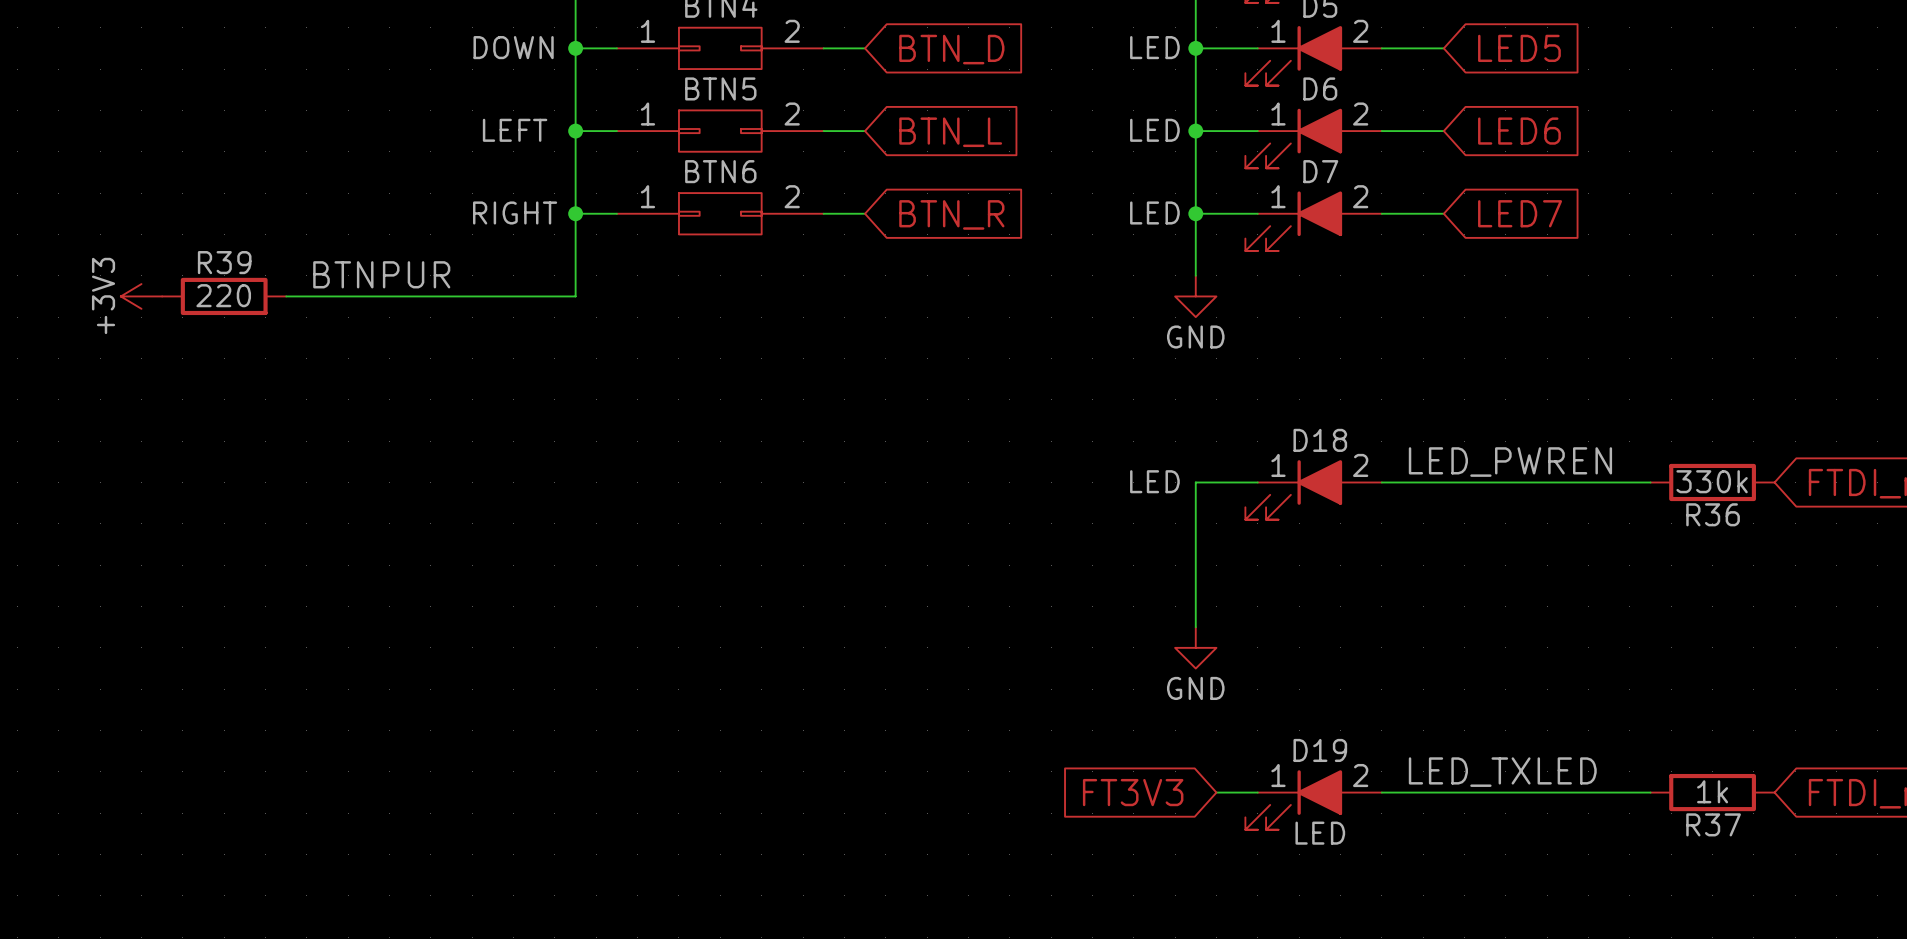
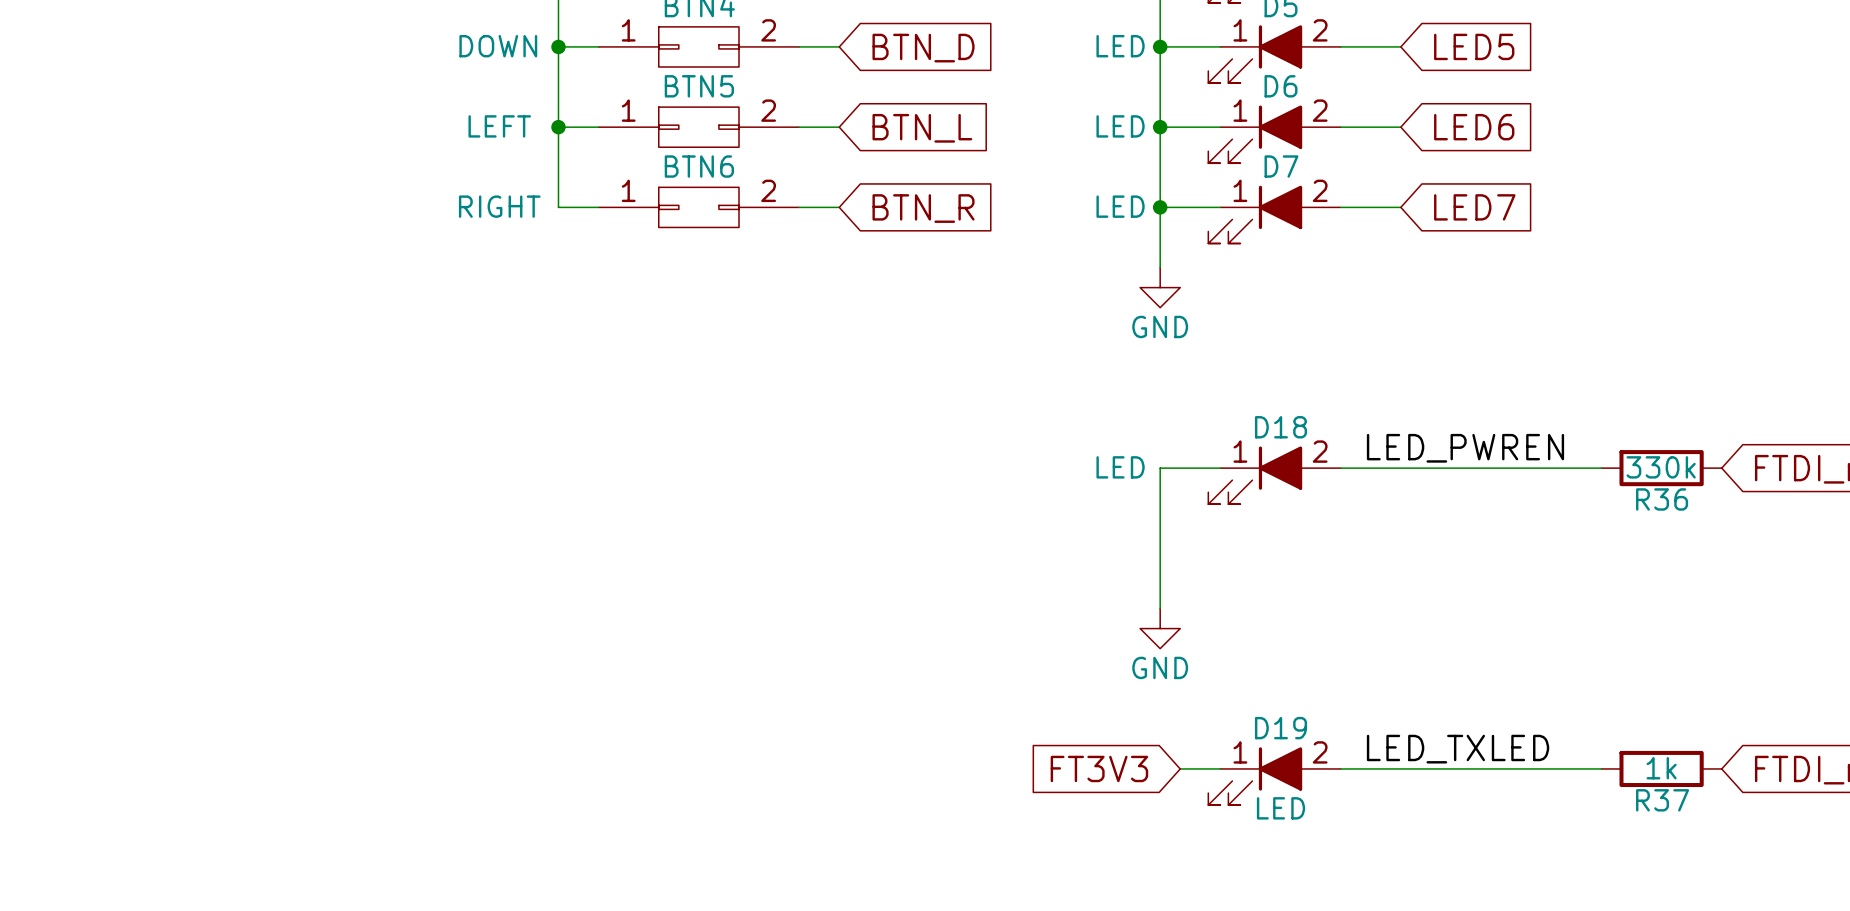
wire: (575, 213) (575, 296) (286, 296) -> none
junction: (575, 213) -> none
label: BTNPUR (381, 274) -> none
power symbol: +3V3 (141, 296) -> none
R39: 220 (224, 296) -> none

